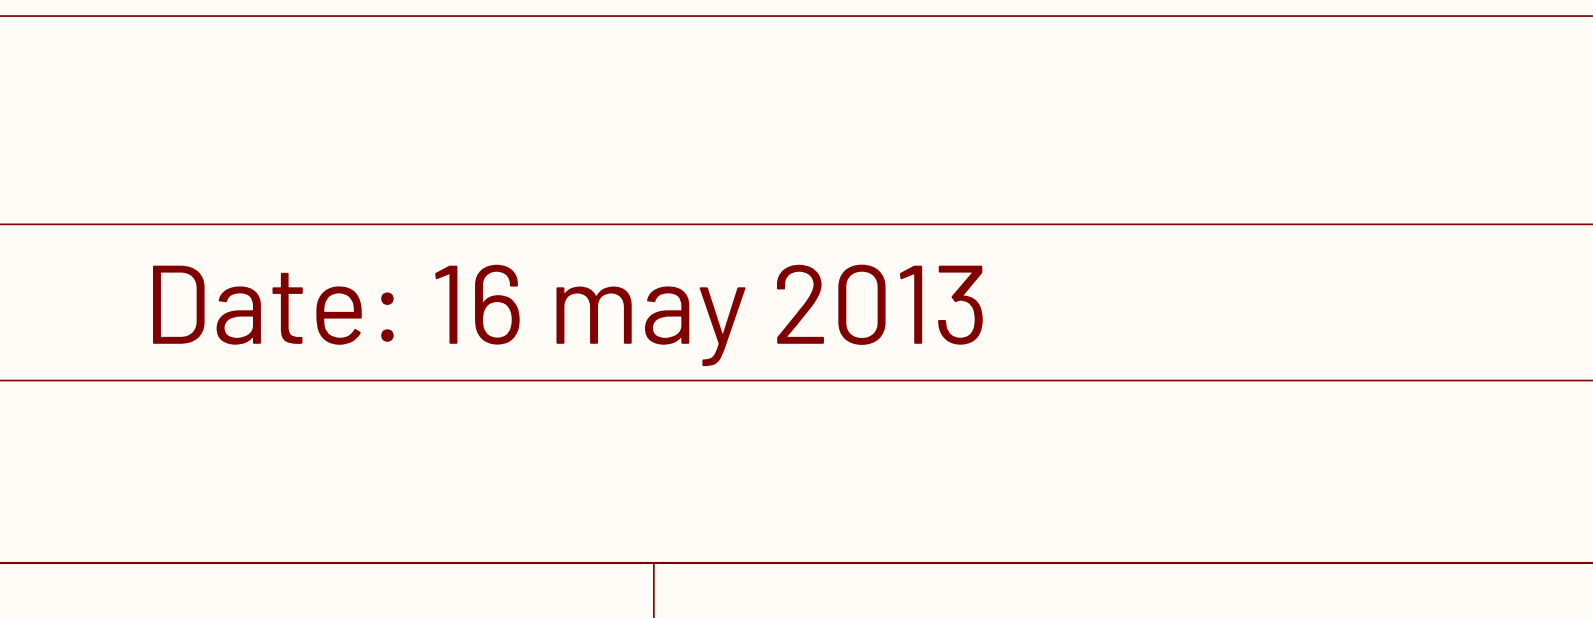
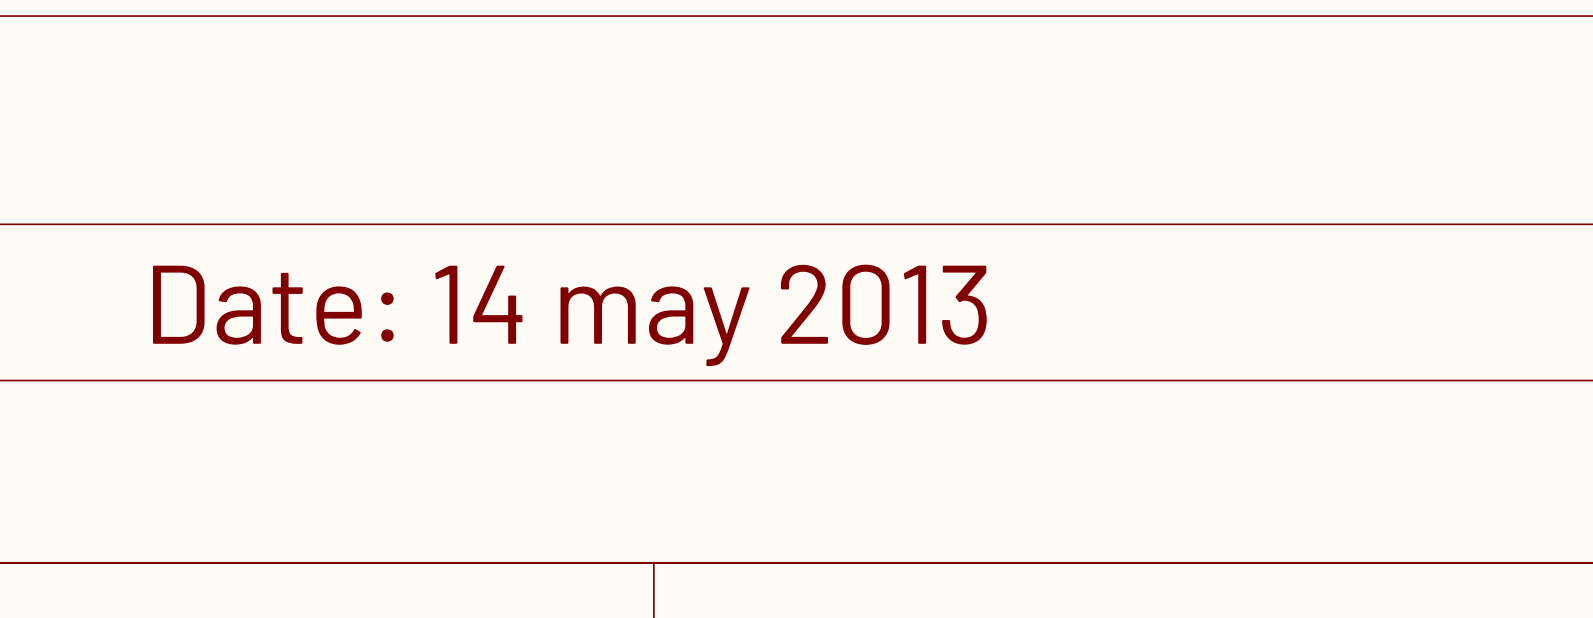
title block: Date: 16 may 2013 (567, 315) -> Date: 14 may 2013 (569, 315)

